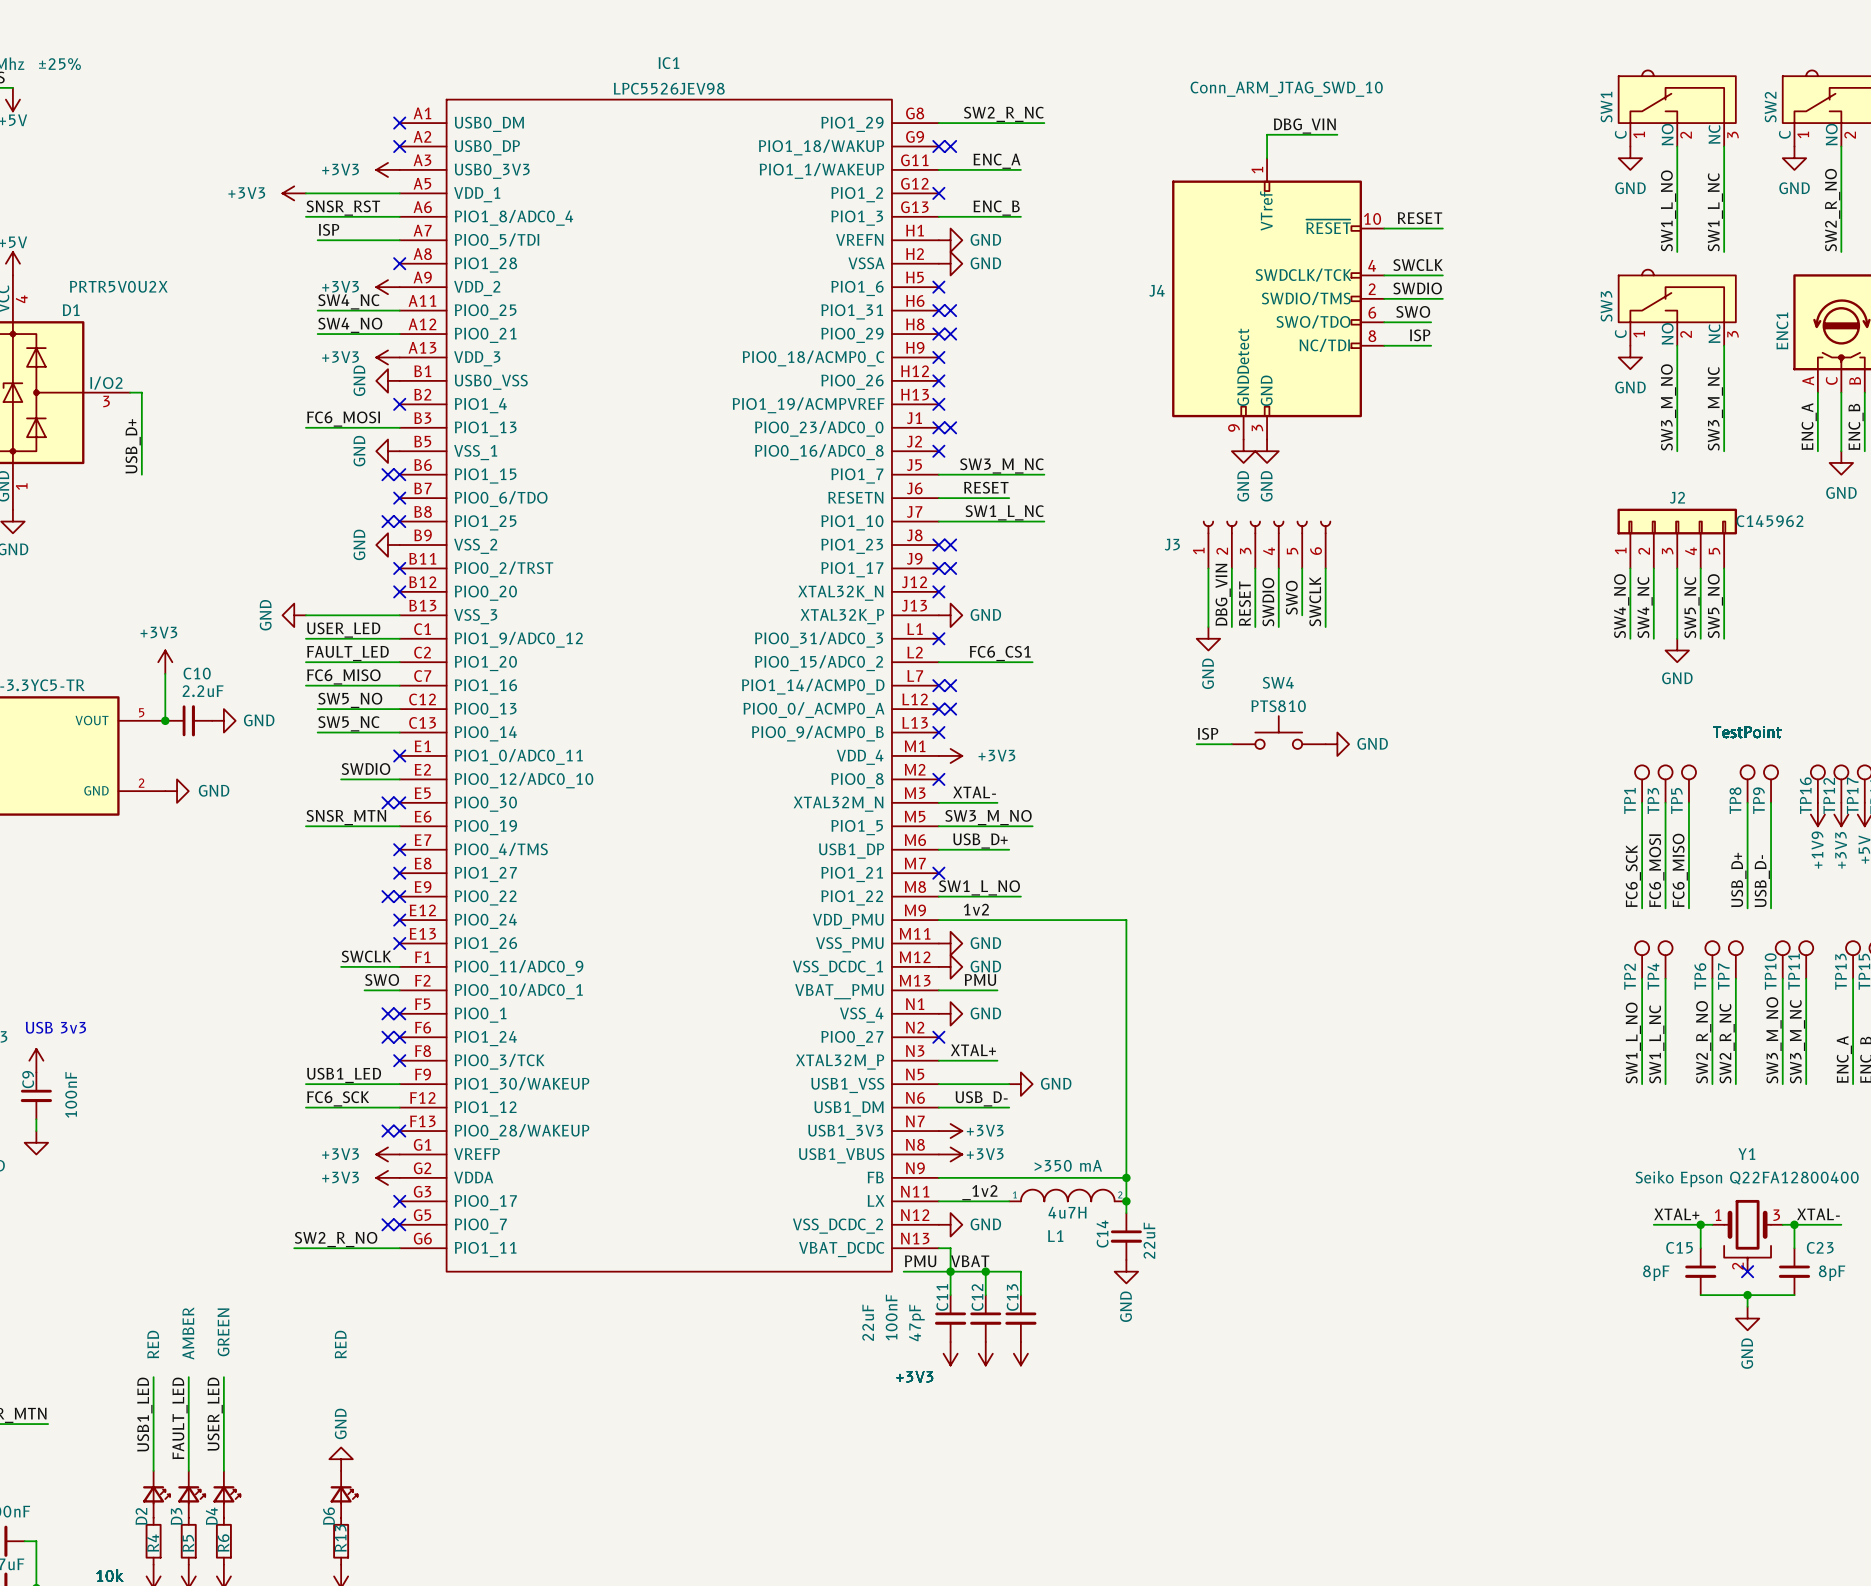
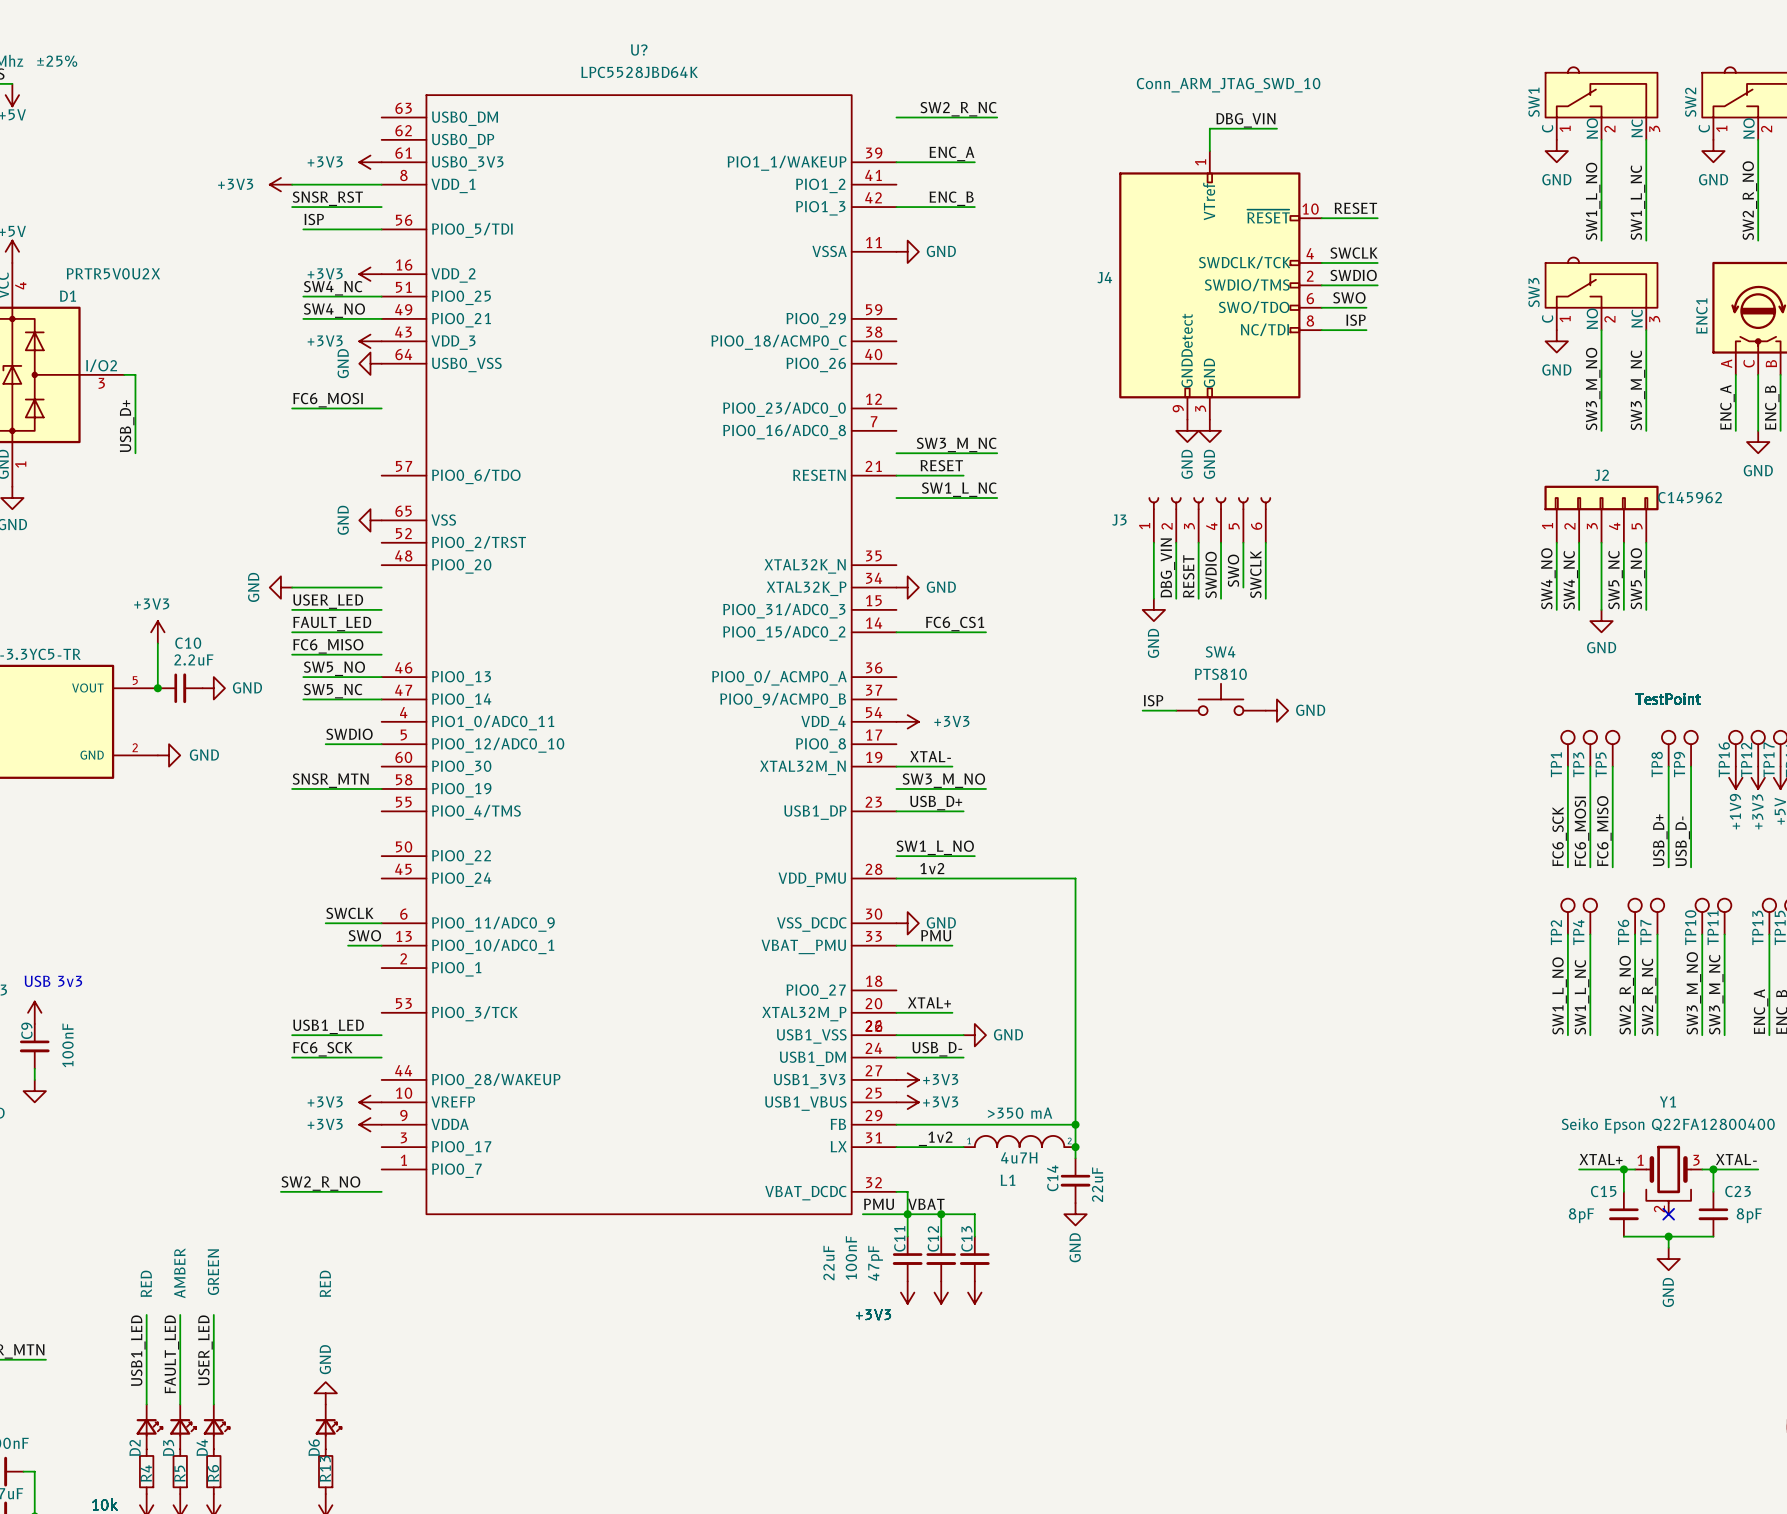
no-connect mark: (399, 123) -> none
no-connect mark: (399, 146) -> none
no-connect mark: (938, 146) -> none
no-connect mark: (950, 146) -> none
no-connect mark: (938, 193) -> none
power symbol: GND (950, 240) -> none
no-connect mark: (399, 263) -> none
no-connect mark: (938, 287) -> none
no-connect mark: (938, 310) -> none
no-connect mark: (950, 310) -> none
no-connect mark: (938, 334) -> none
no-connect mark: (950, 334) -> none
no-connect mark: (938, 357) -> none
no-connect mark: (938, 380) -> none
no-connect mark: (399, 404) -> none
no-connect mark: (938, 404) -> none
no-connect mark: (938, 427) -> none
no-connect mark: (950, 427) -> none
power symbol: GND (388, 451) -> none
no-connect mark: (938, 451) -> none
no-connect mark: (388, 474) -> none
no-connect mark: (399, 474) -> none
no-connect mark: (399, 498) -> none
no-connect mark: (388, 521) -> none
no-connect mark: (399, 521) -> none
no-connect mark: (938, 545) -> none
no-connect mark: (950, 545) -> none
no-connect mark: (399, 568) -> none
no-connect mark: (938, 568) -> none
no-connect mark: (950, 568) -> none
no-connect mark: (399, 591) -> none
no-connect mark: (938, 591) -> none
no-connect mark: (938, 638) -> none
IC1: LPC5526JEV98 (669, 685) -> none
U?: none -> LPC5528JBD64K (639, 654)
no-connect mark: (938, 685) -> none
no-connect mark: (950, 685) -> none
no-connect mark: (938, 709) -> none
no-connect mark: (950, 709) -> none
no-connect mark: (938, 732) -> none
no-connect mark: (399, 755) -> none
no-connect mark: (938, 779) -> none
no-connect mark: (388, 802) -> none
no-connect mark: (399, 802) -> none
no-connect mark: (399, 849) -> none
no-connect mark: (399, 873) -> none
no-connect mark: (938, 873) -> none
no-connect mark: (388, 896) -> none
no-connect mark: (399, 896) -> none
no-connect mark: (399, 920) -> none
no-connect mark: (399, 943) -> none
power symbol: GND (950, 943) -> none
no-connect mark: (388, 1013) -> none
no-connect mark: (399, 1013) -> none
power symbol: GND (950, 1013) -> none
no-connect mark: (388, 1037) -> none
no-connect mark: (399, 1037) -> none
no-connect mark: (938, 1037) -> none
no-connect mark: (399, 1060) -> none
no-connect mark: (388, 1131) -> none
no-connect mark: (399, 1131) -> none
no-connect mark: (399, 1201) -> none
no-connect mark: (388, 1224) -> none
no-connect mark: (399, 1224) -> none
power symbol: GND (950, 1224) -> none

